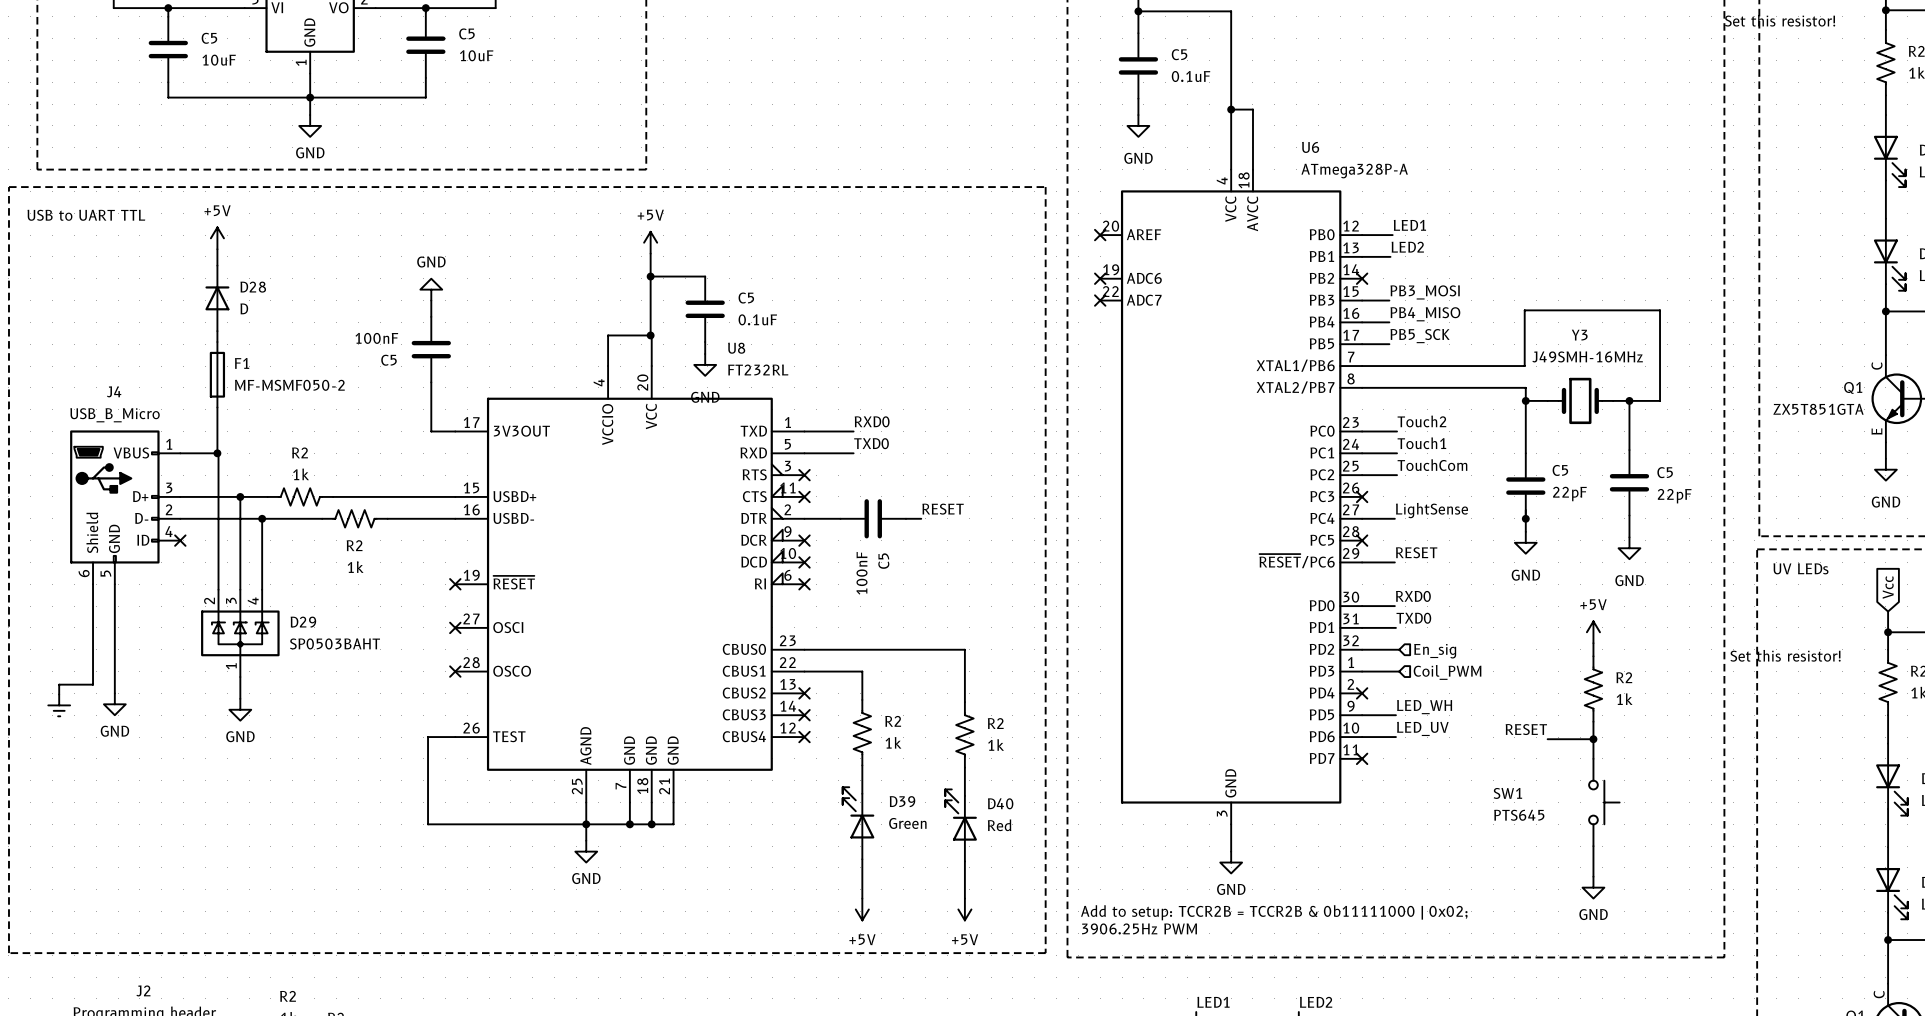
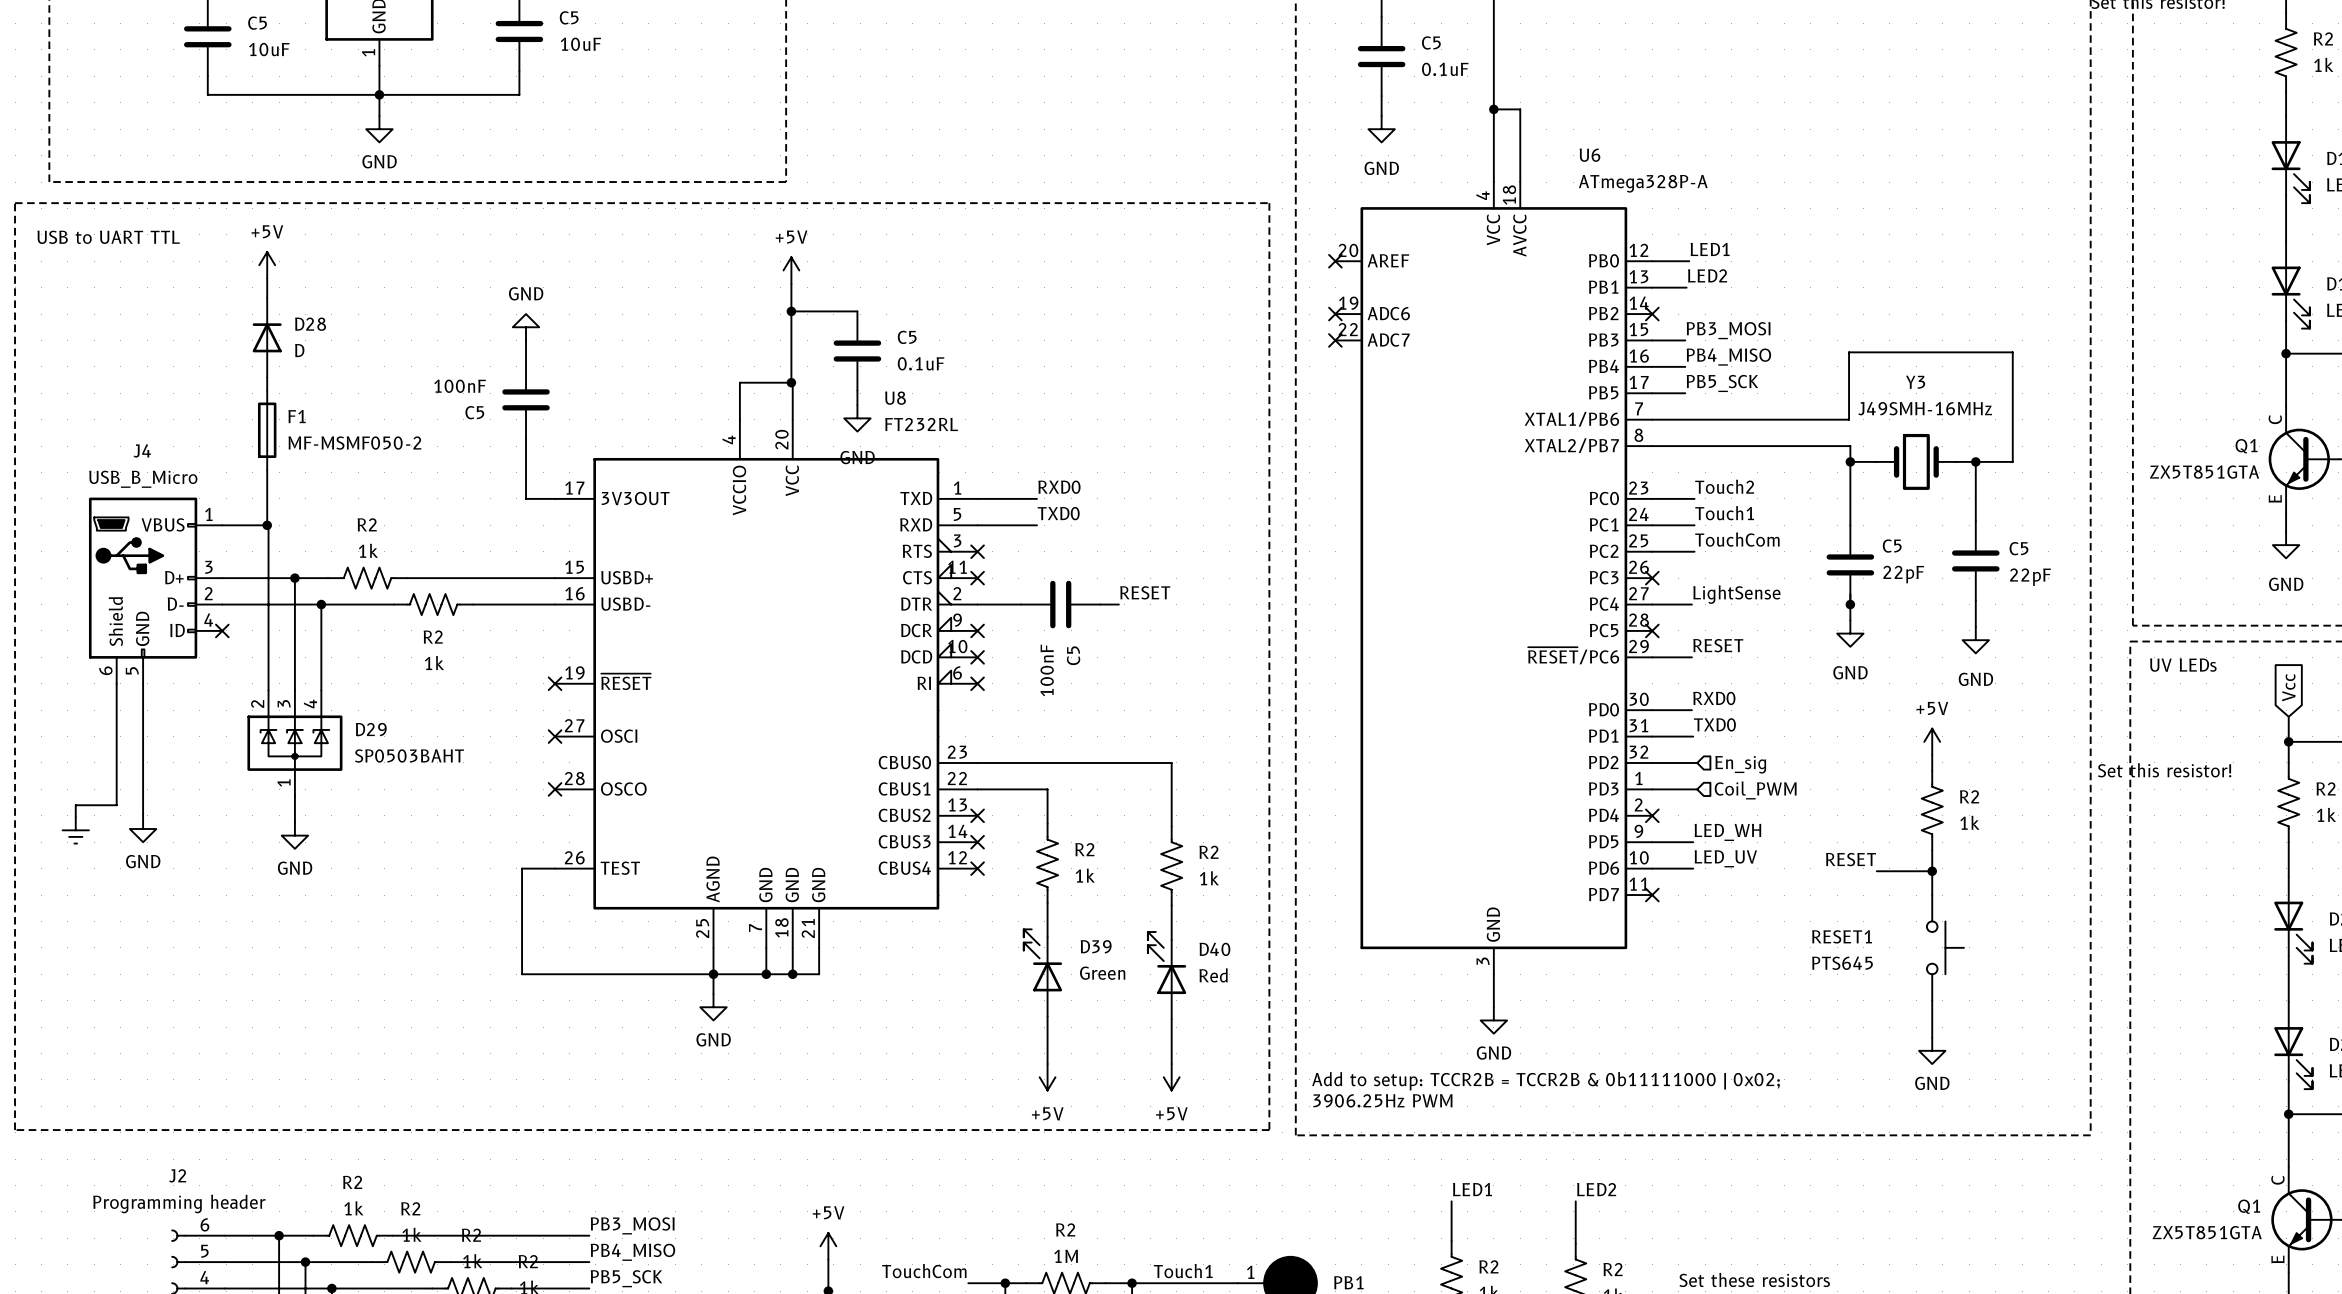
SW1 name: SW1 (1507, 793) -> RESET1 (1842, 936)

